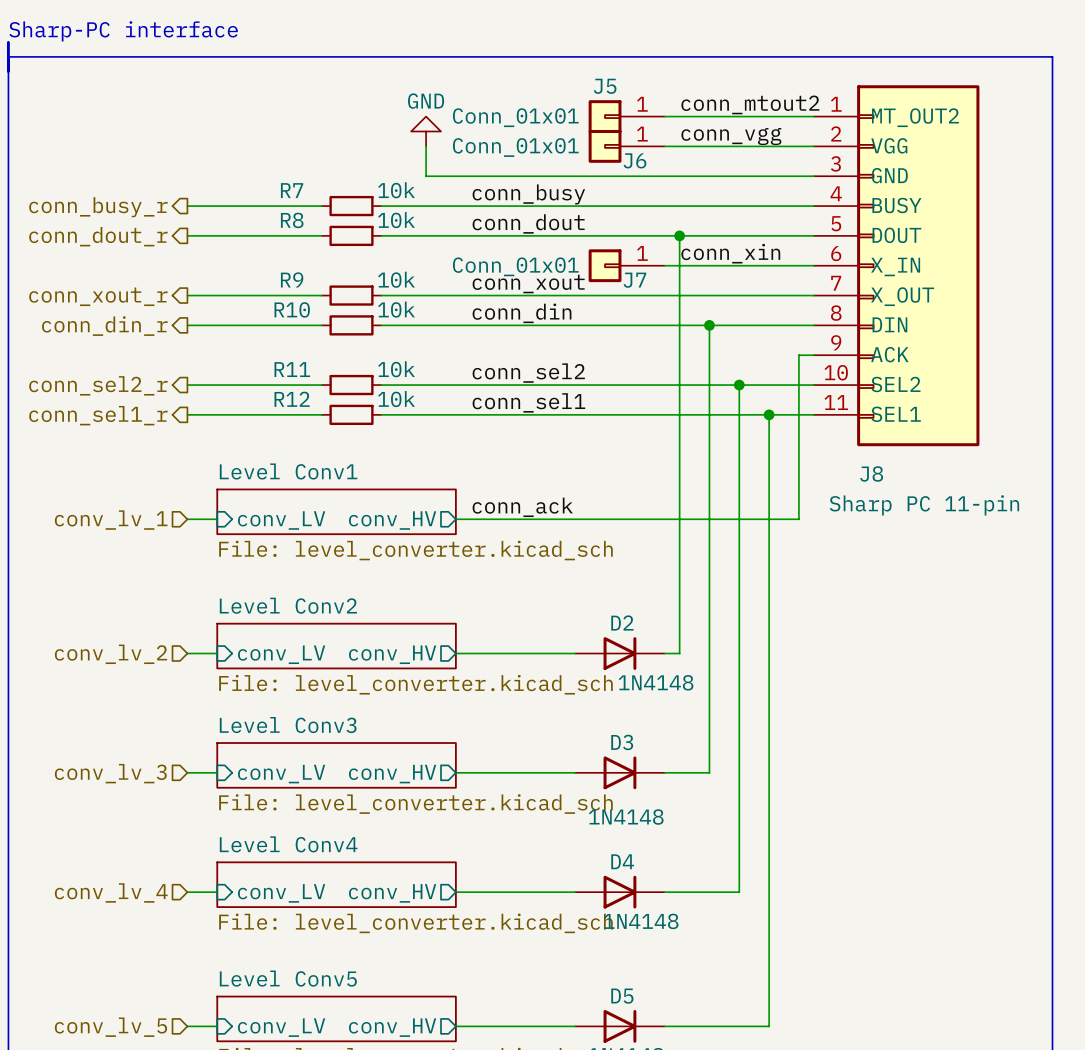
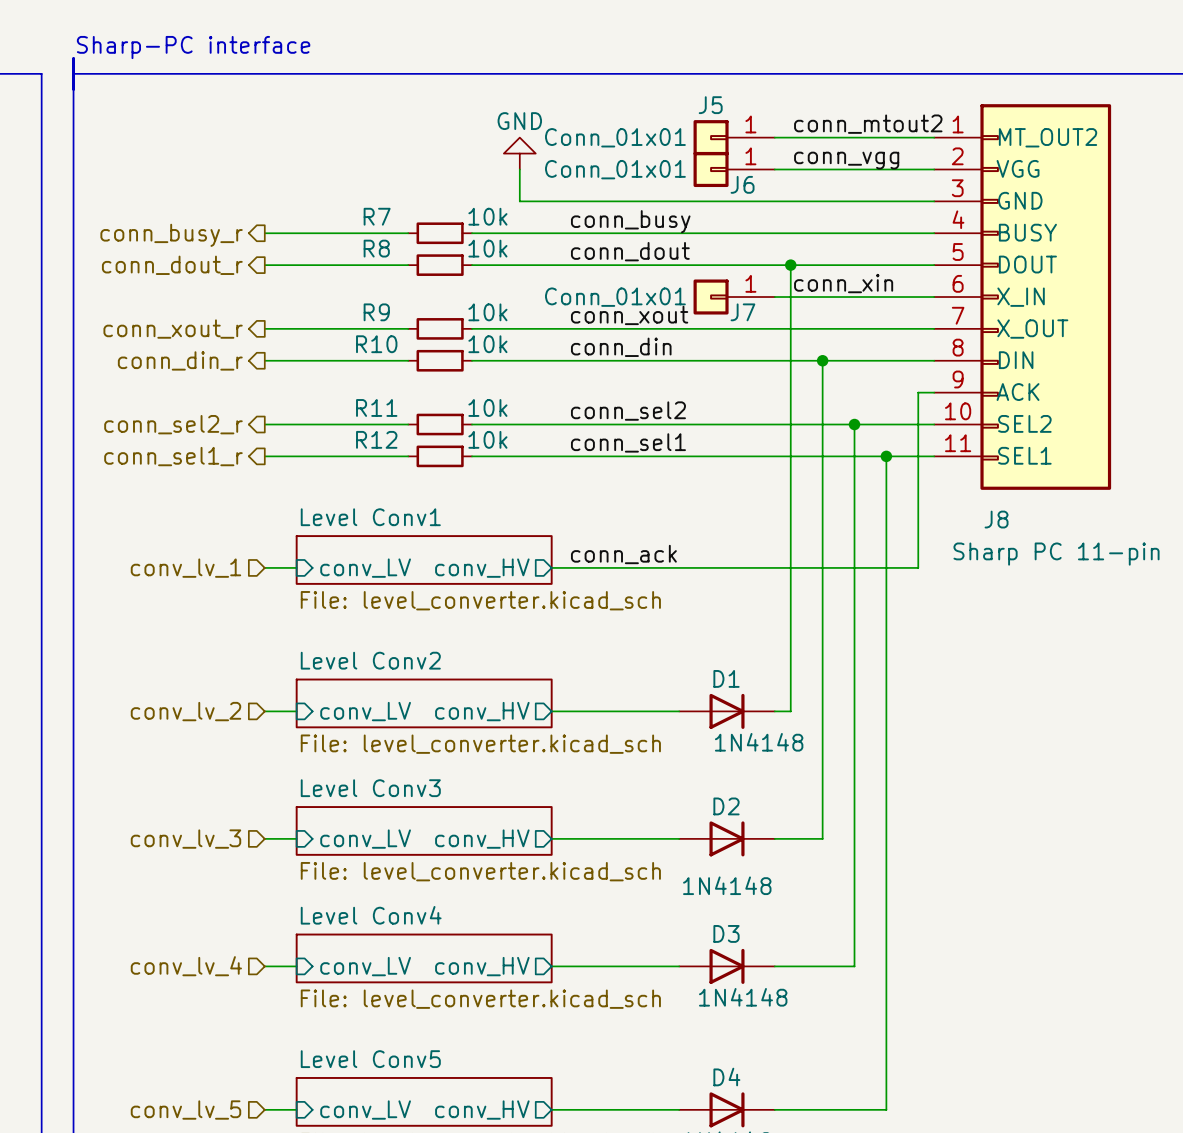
D2 name: D2 (622, 623) -> D1 (726, 678)
D3 name: D3 (622, 742) -> D2 (726, 806)
D4 name: D4 (622, 861) -> D3 (726, 933)
D5 name: D5 (622, 996) -> D4 (726, 1077)

